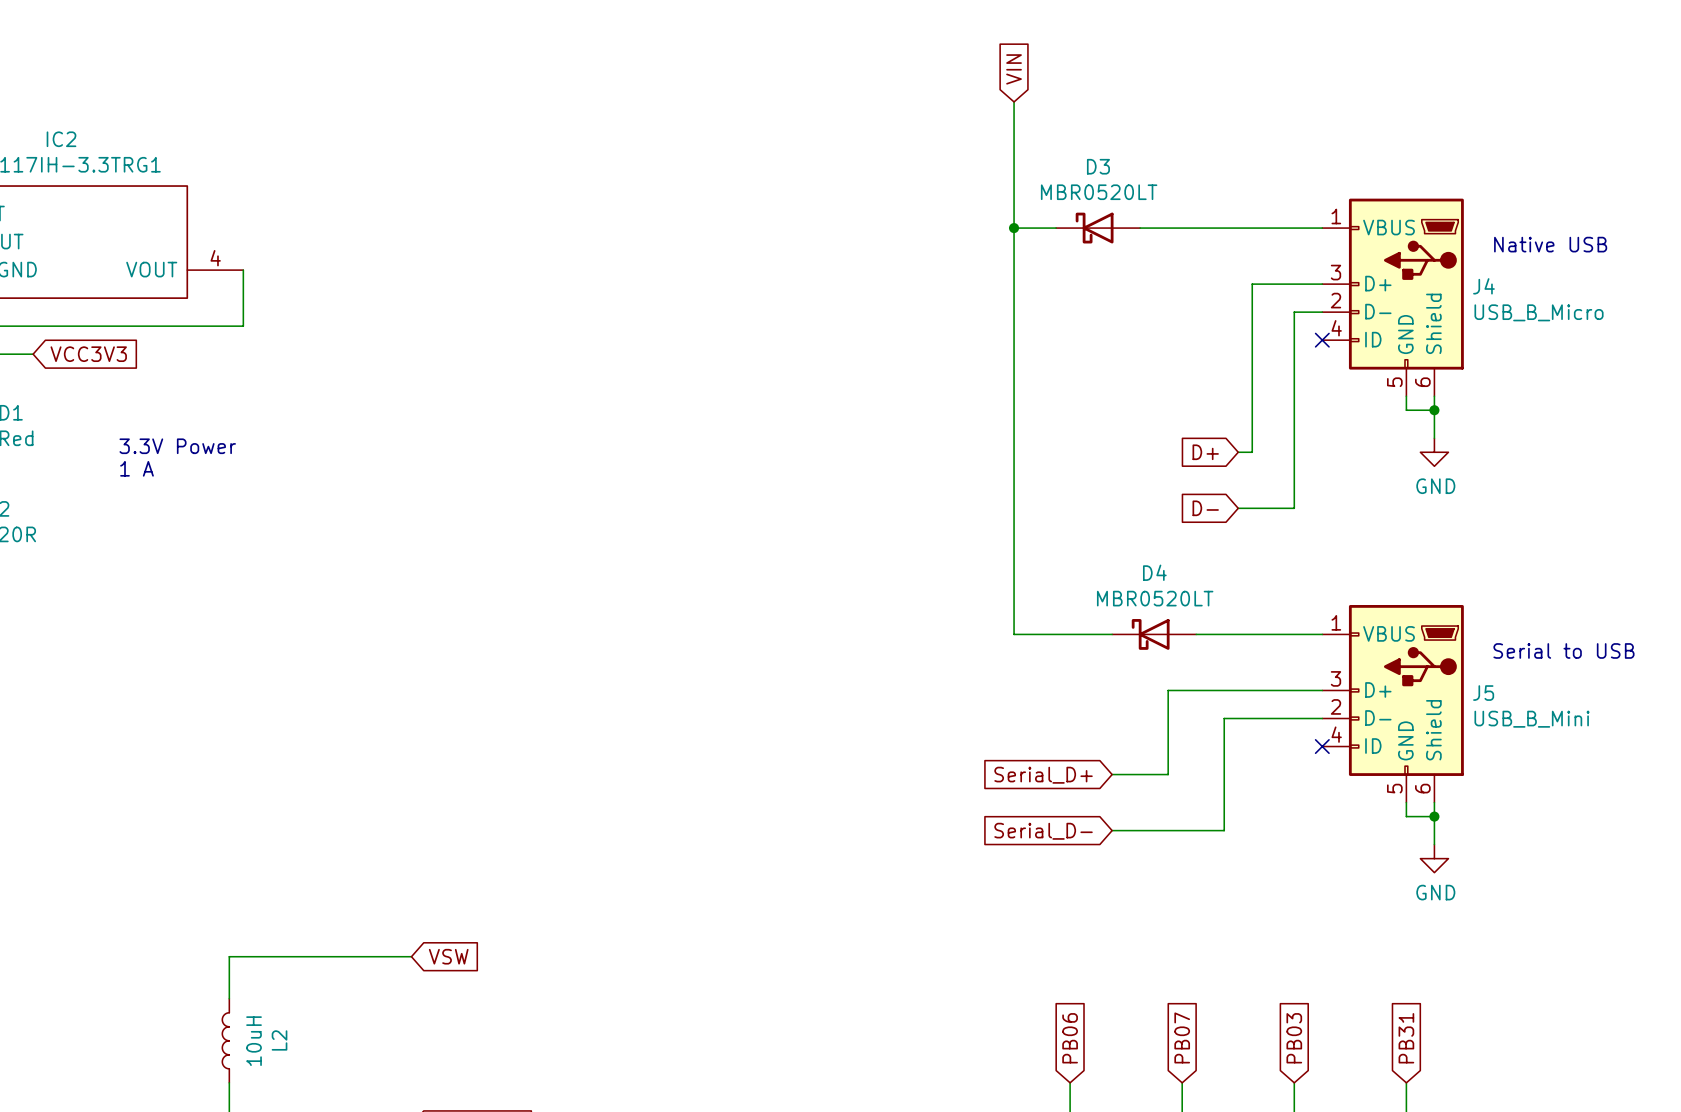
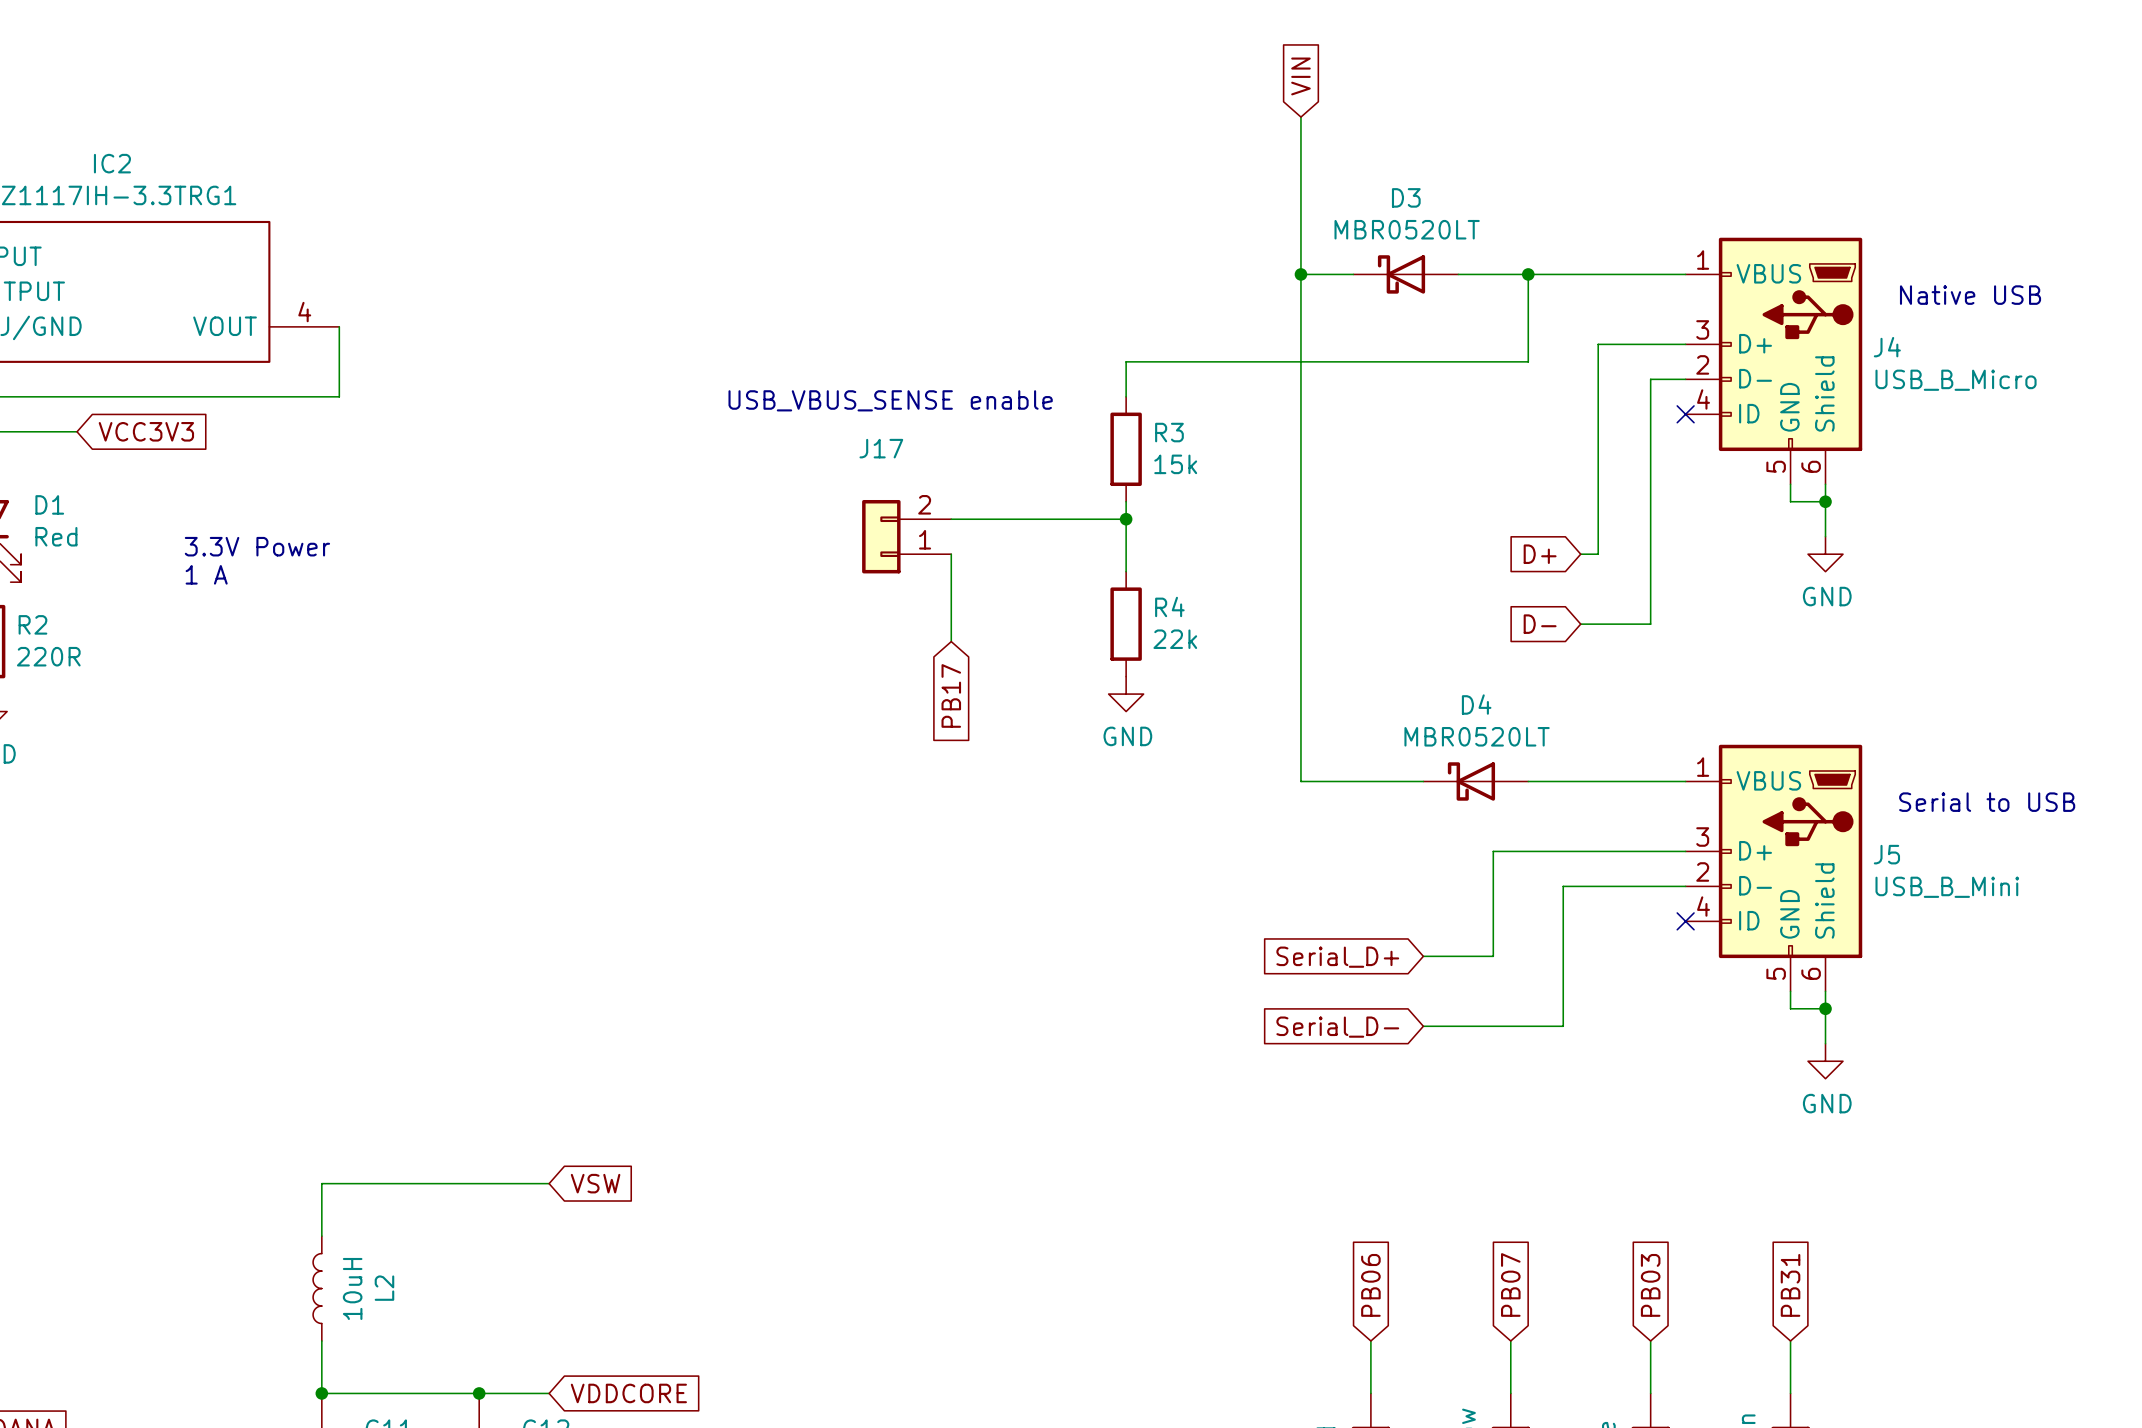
wire: none -> (1528, 274) (1528, 361) (1126, 361) (1126, 396)
junction: none -> (1528, 274)
text: none -> USB_VBUS_SENSE enable (890, 400)
R3: none -> 15k (1126, 449)
wire: none -> (1126, 501) (1126, 571)
wire: none -> (951, 519) (1126, 519)
junction: none -> (1126, 519)
J17: none -> (906, 536)
wire: none -> (951, 554) (951, 641)
R4: none -> 22k (1126, 624)
power symbol: none -> GND (1126, 694)
global label: none -> PB17 (951, 695)

